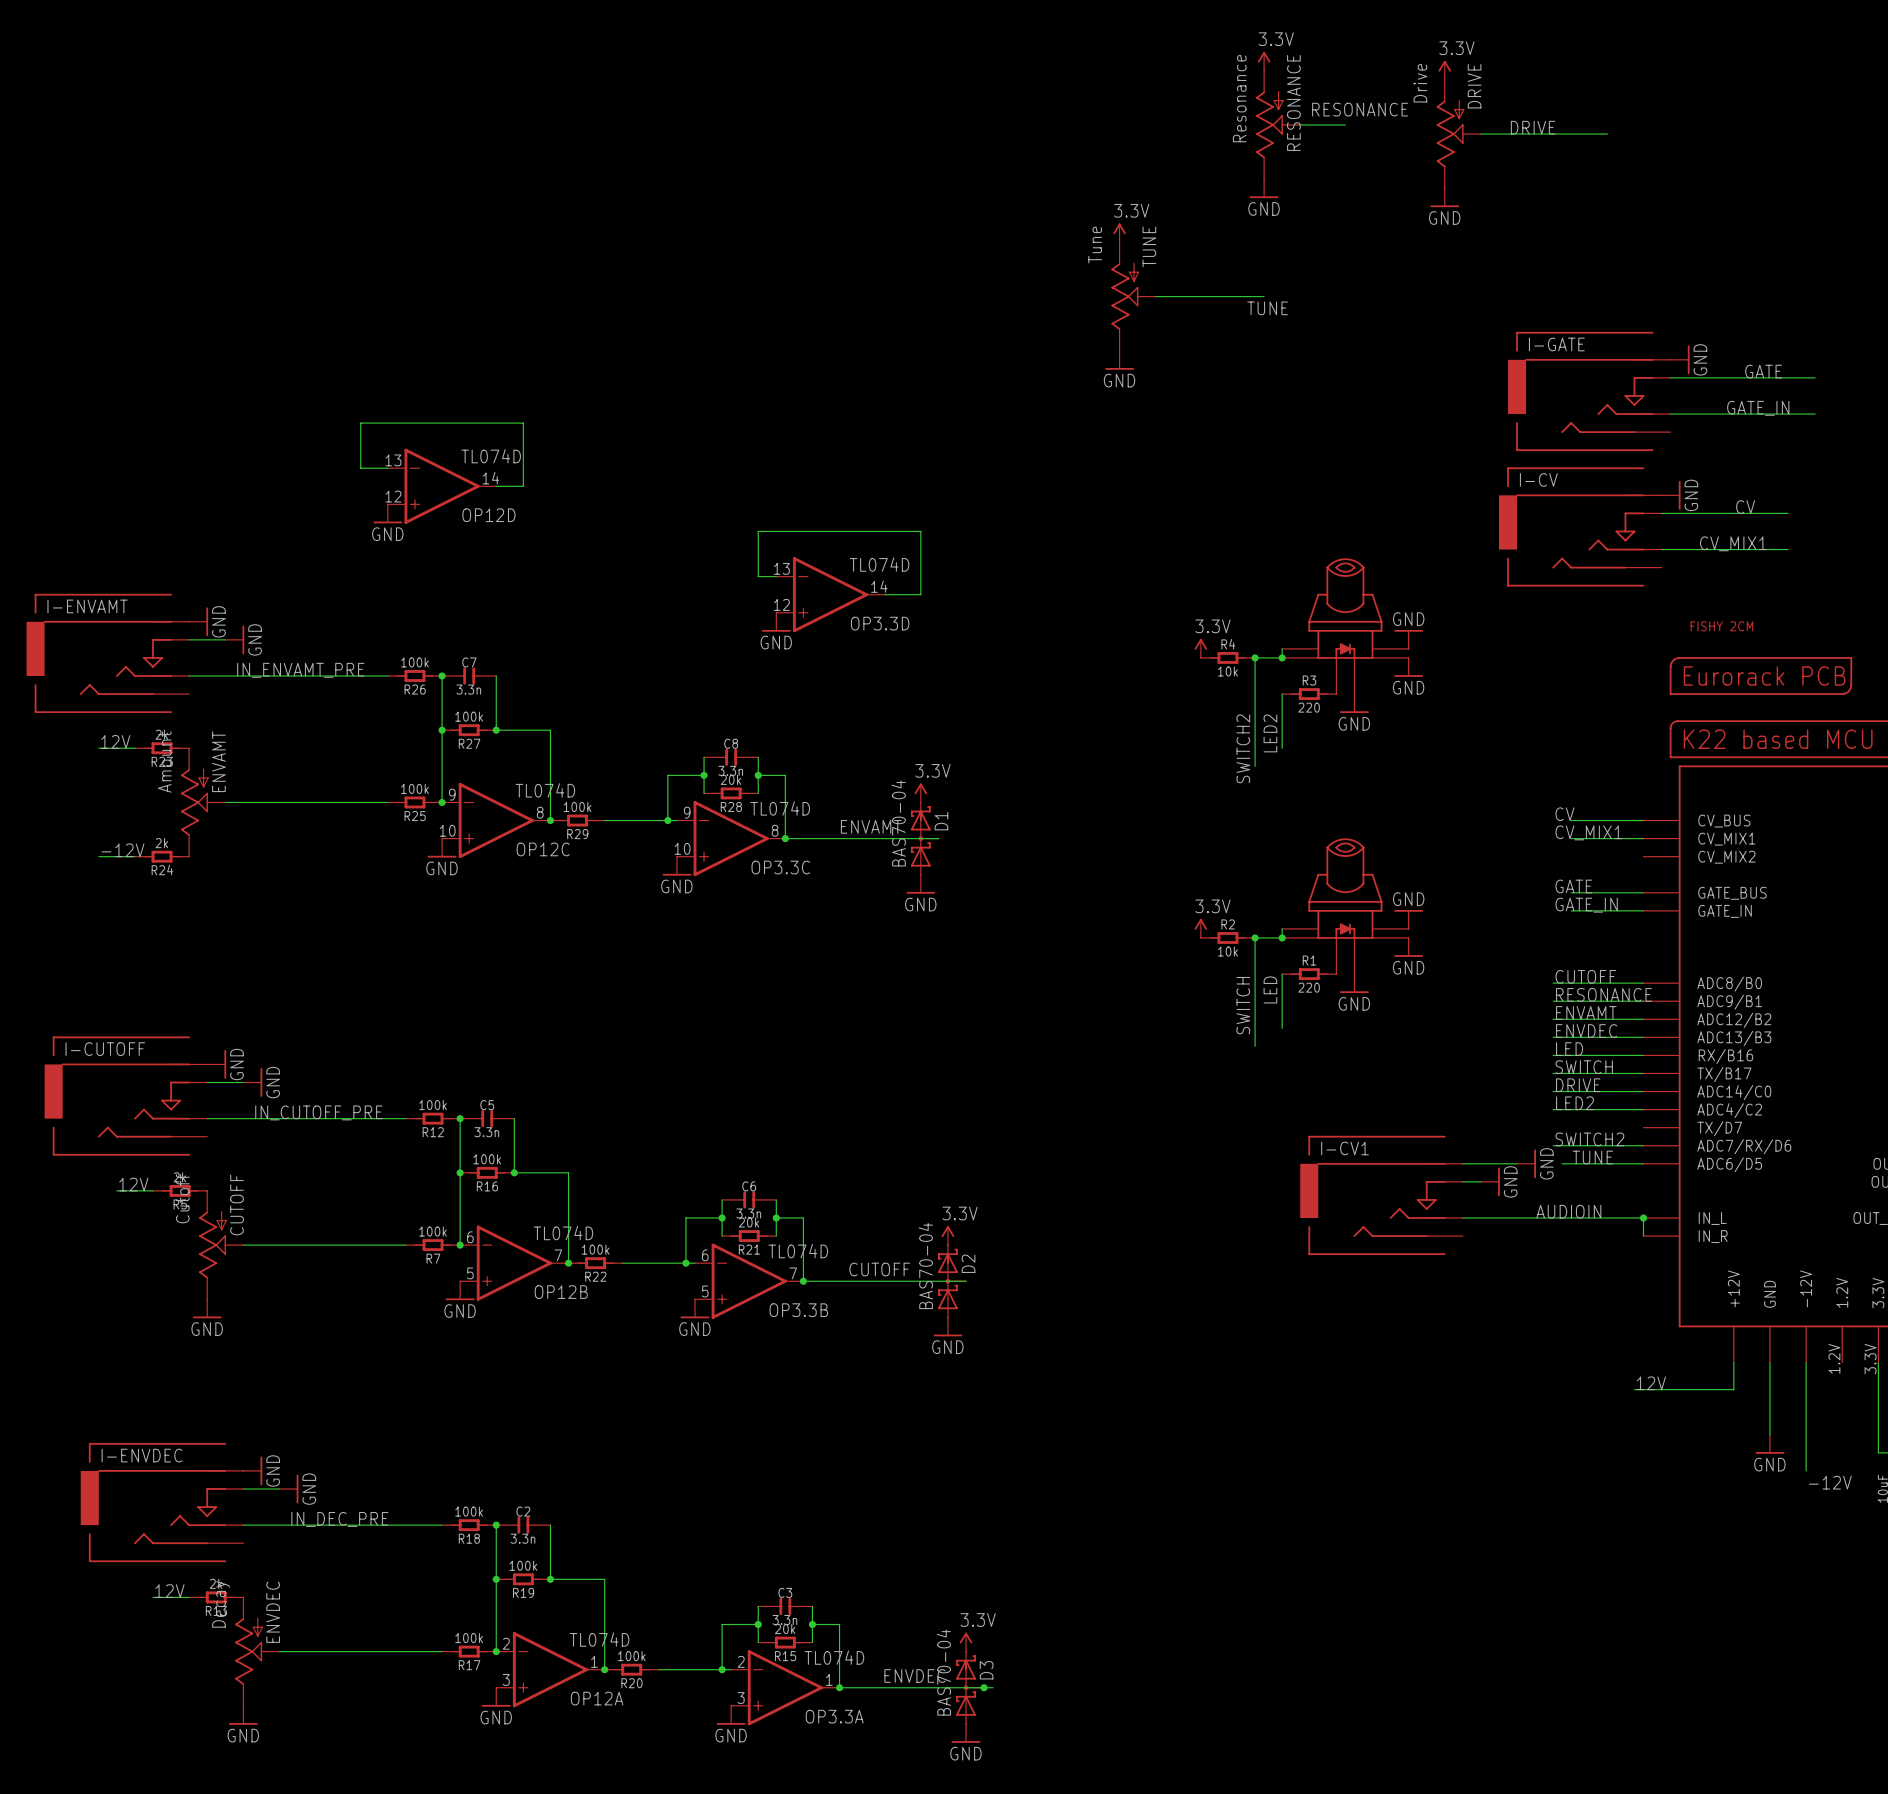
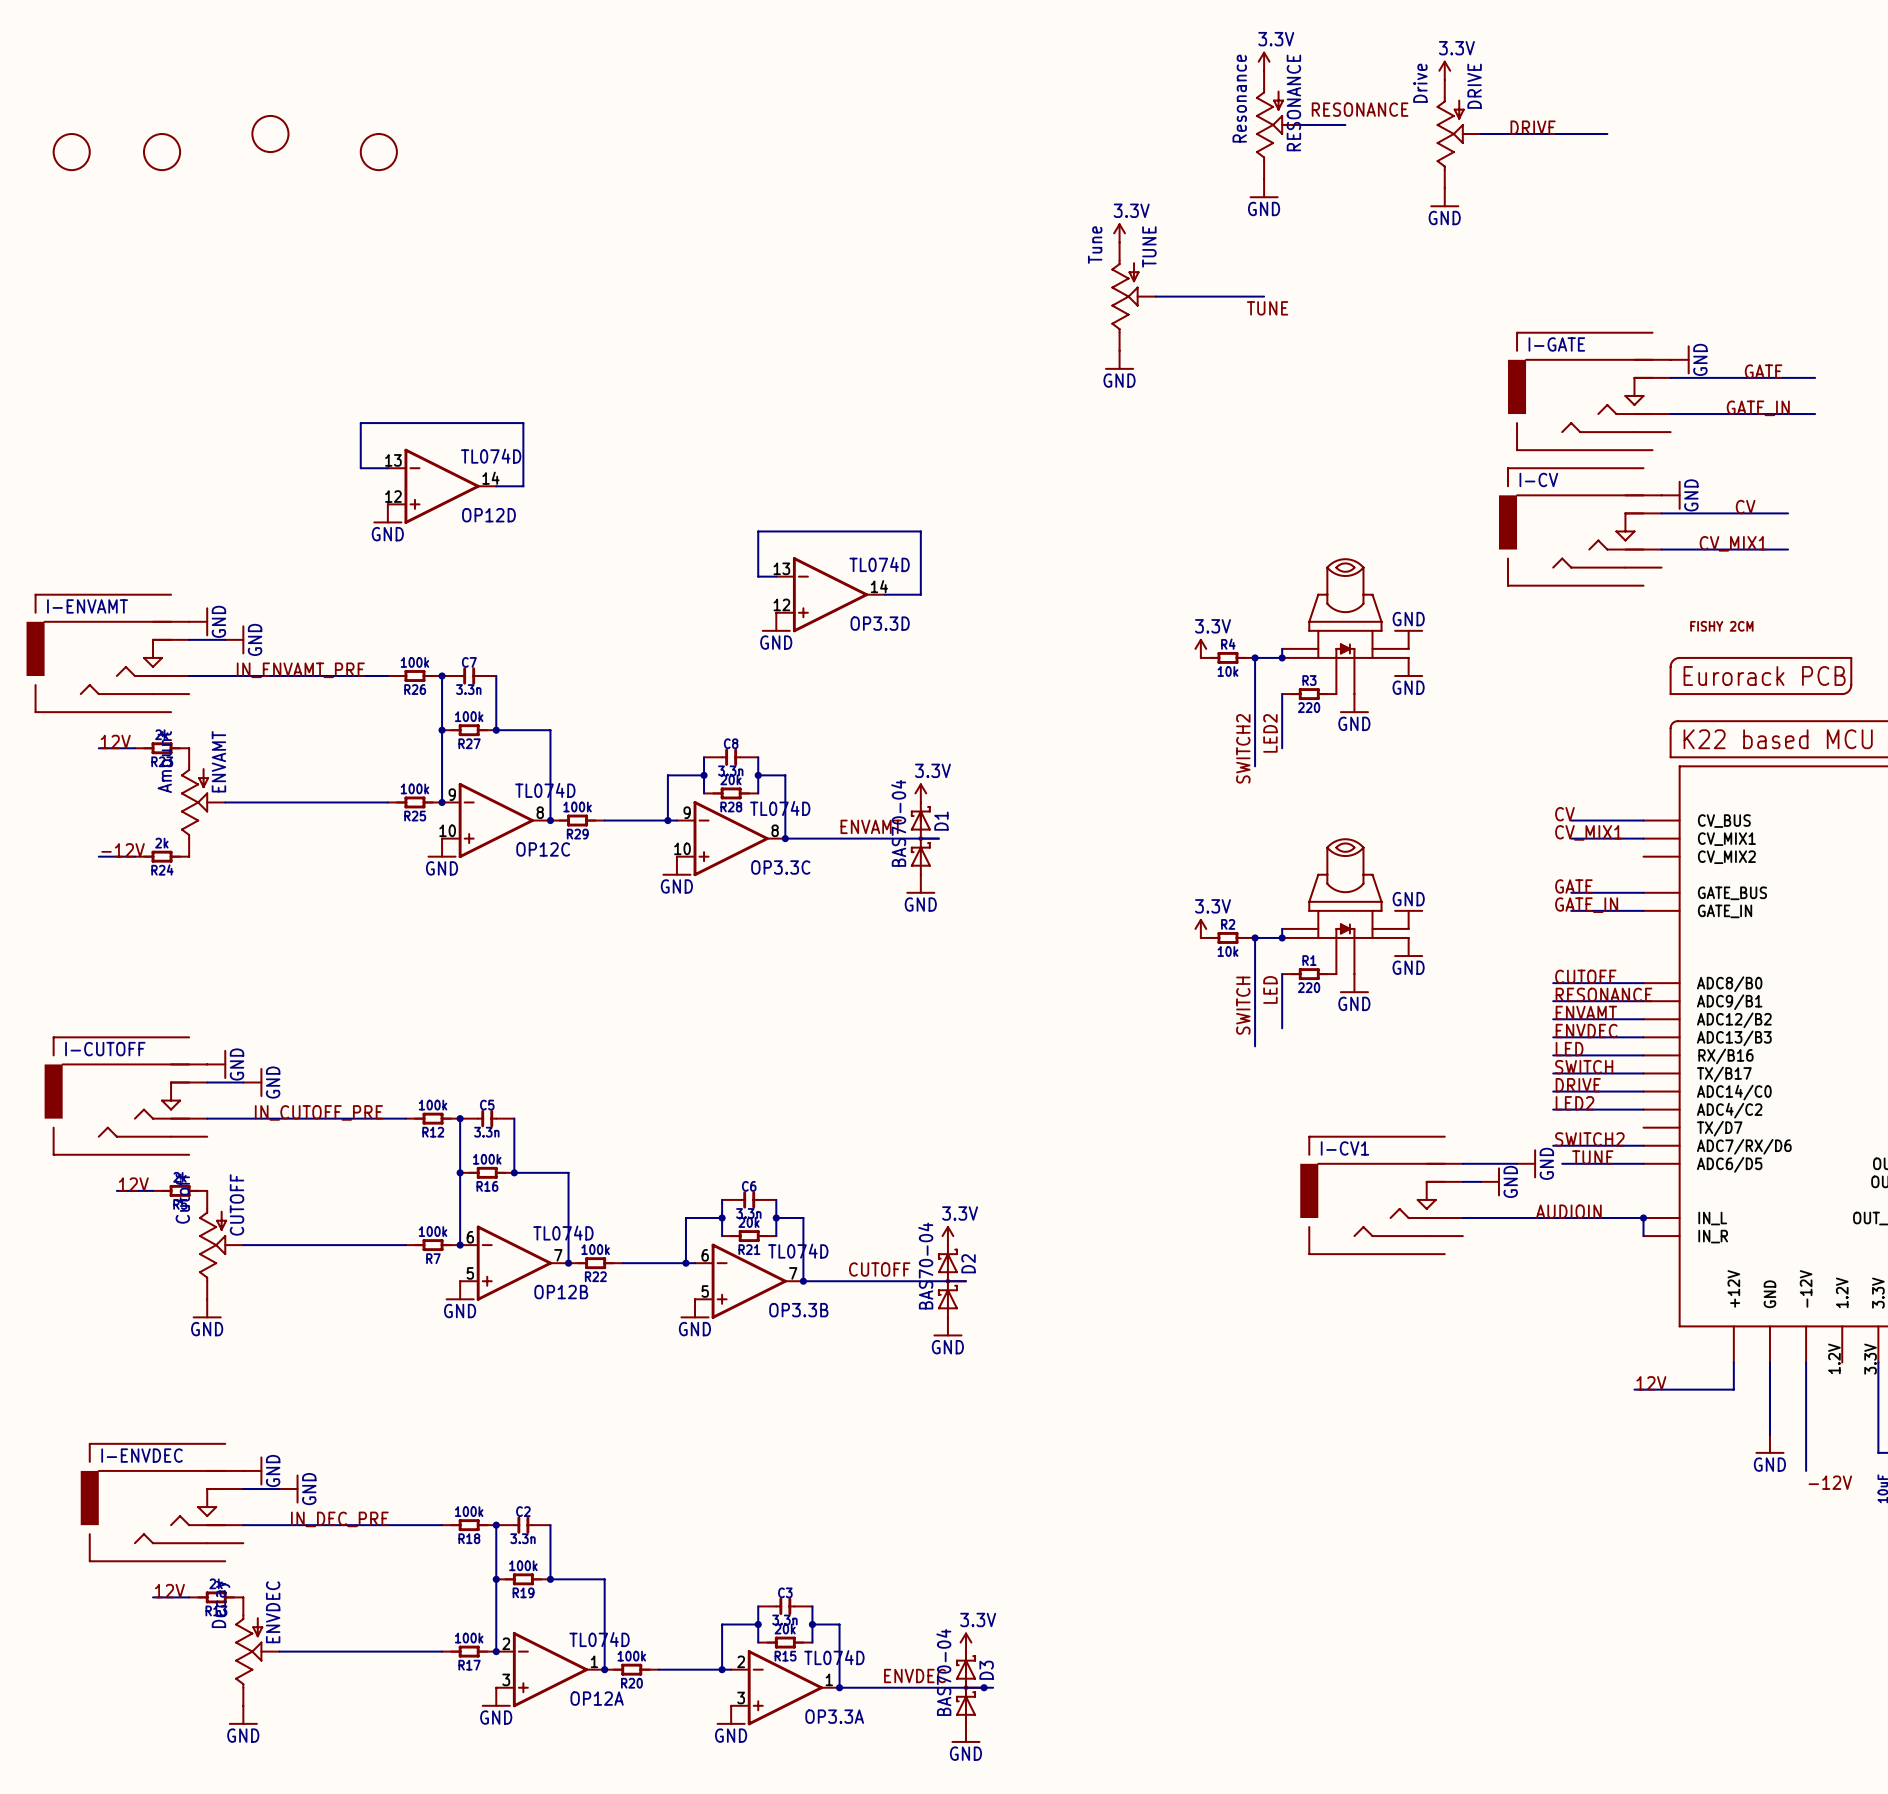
part: none -> (270, 134)
part: none -> (71, 152)
part: none -> (162, 152)
part: none -> (378, 152)

